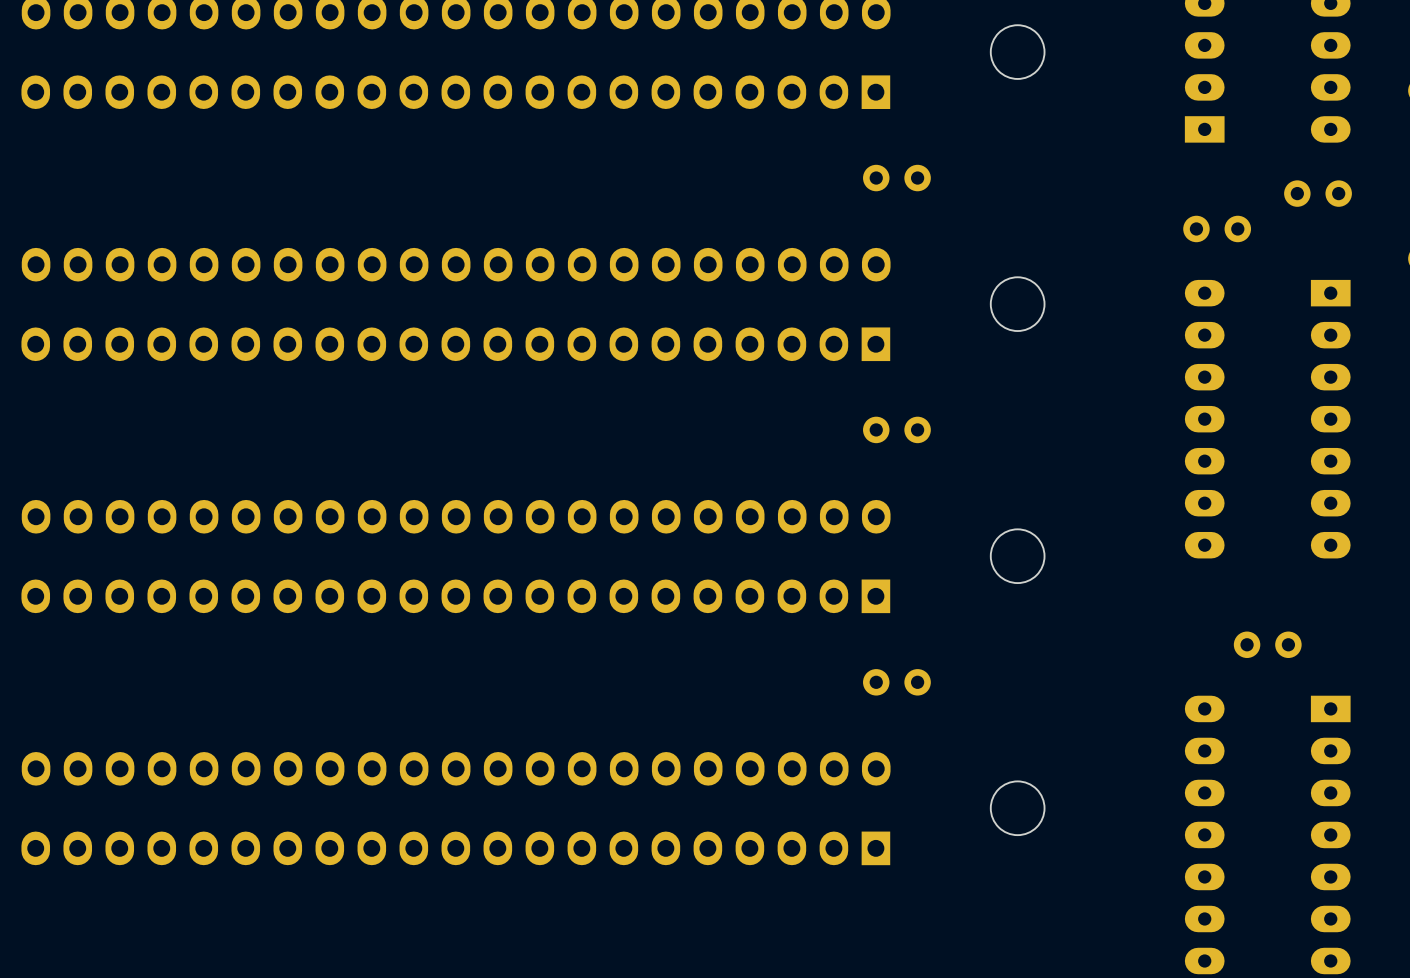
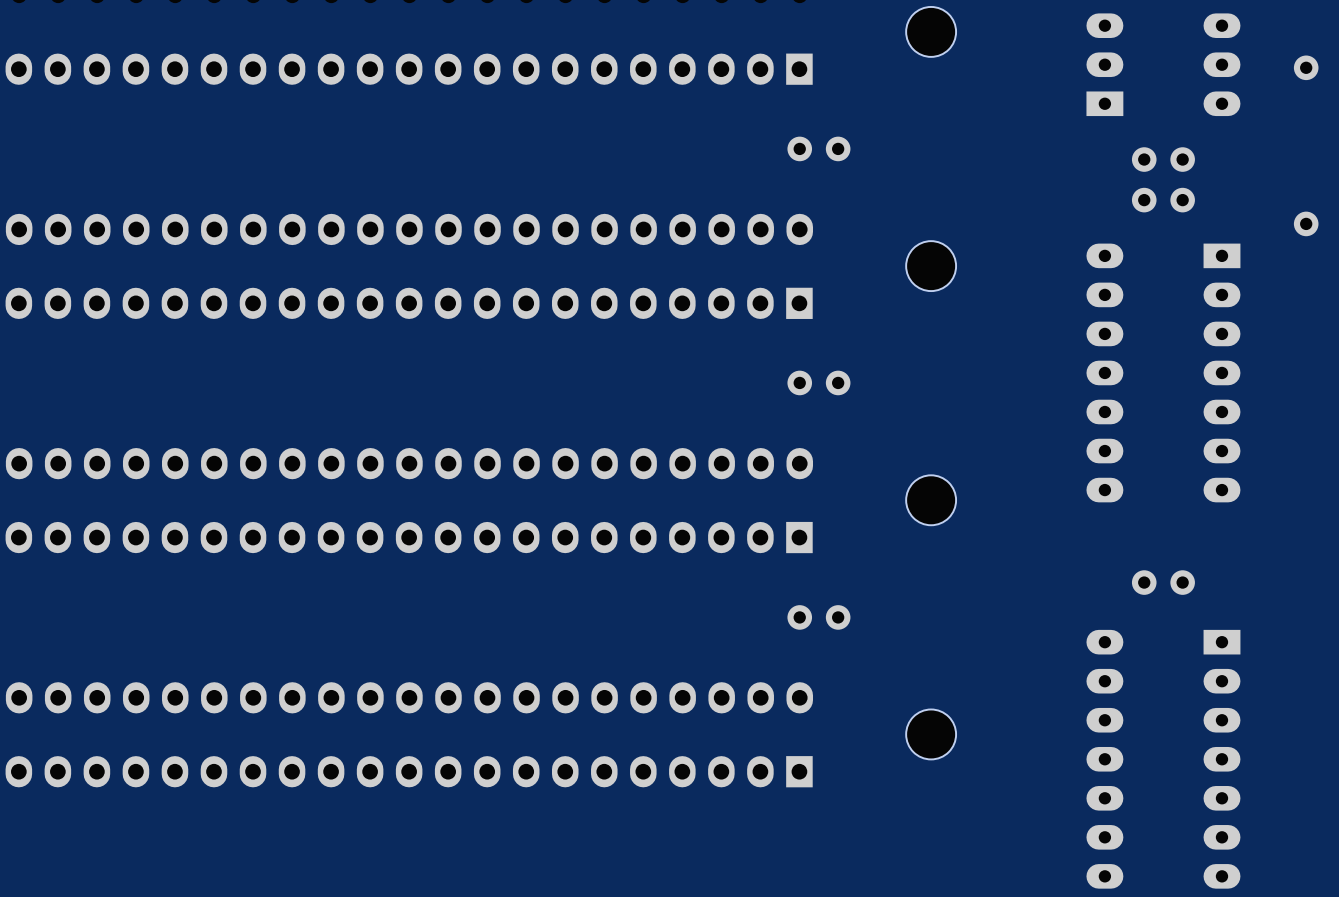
part: none -> (1163, 159)
part: (1318, 193) -> none
part: (1217, 228) -> none
part: none -> (1163, 200)

